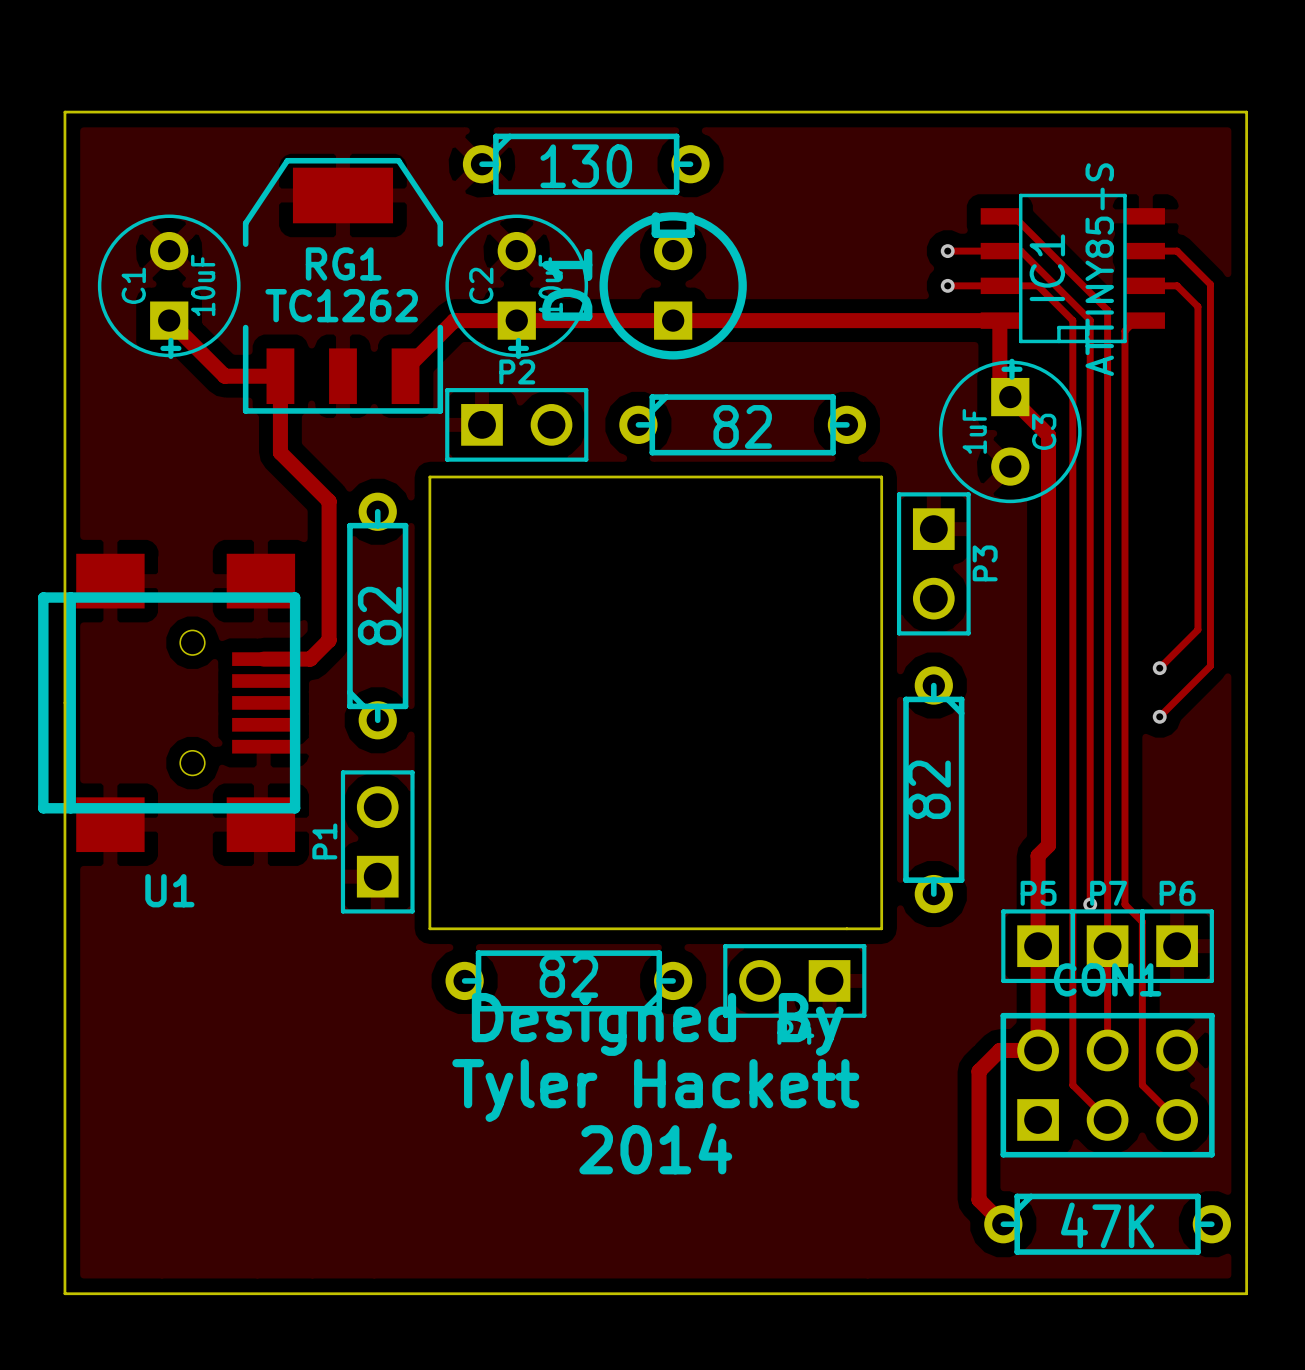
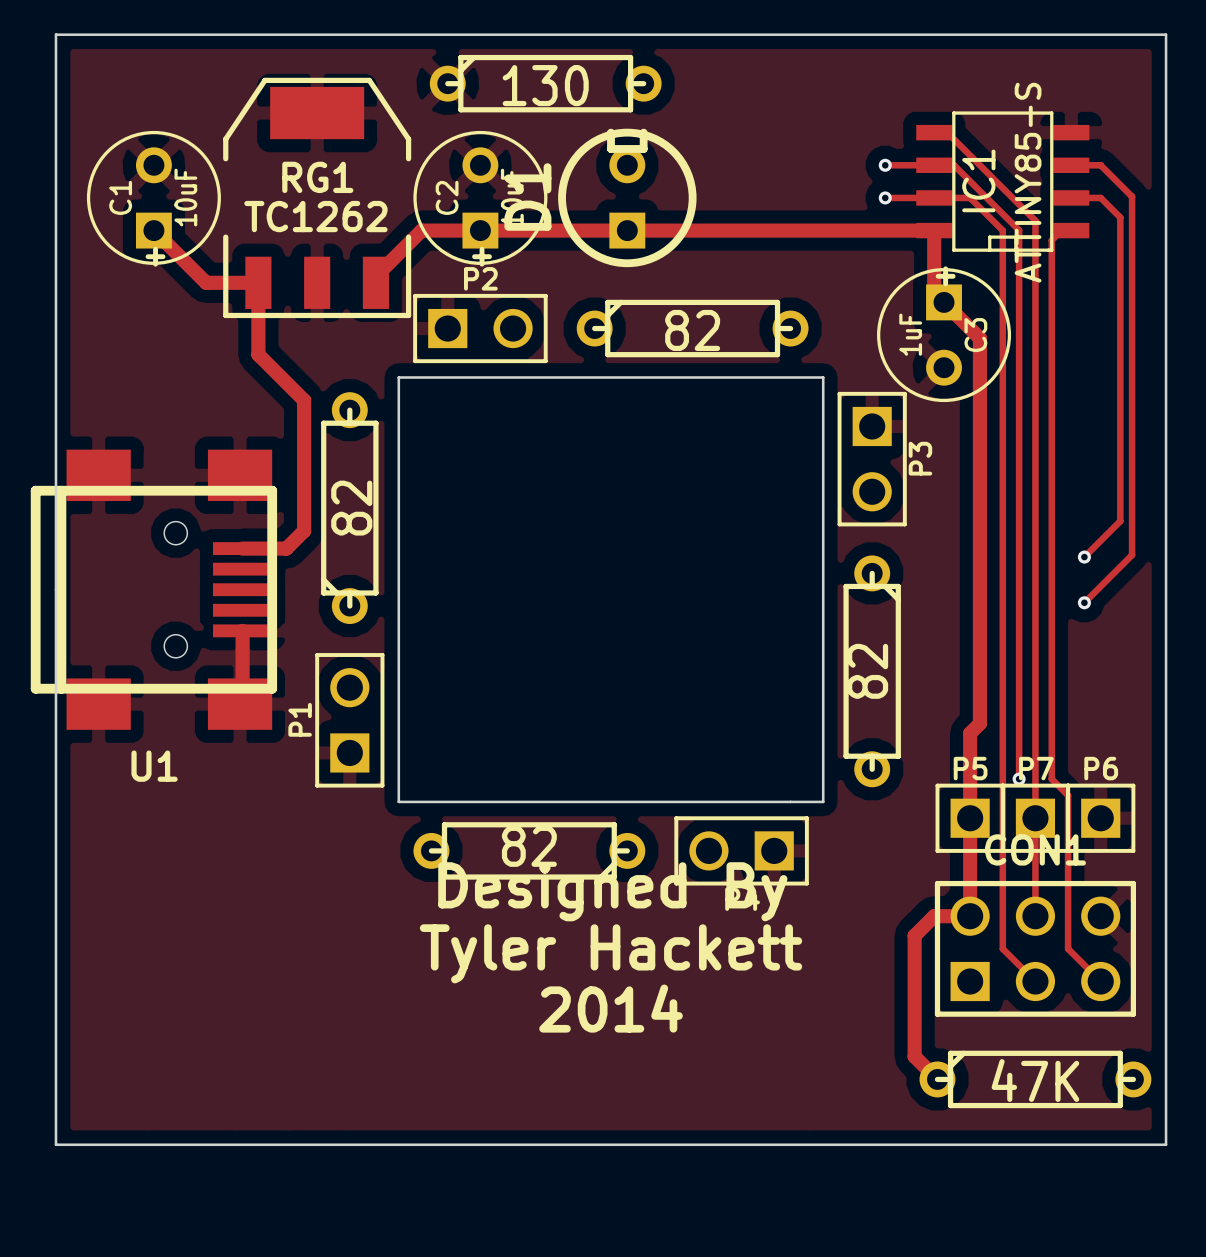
track: none -> (242, 630) (242, 701) (240, 704)

